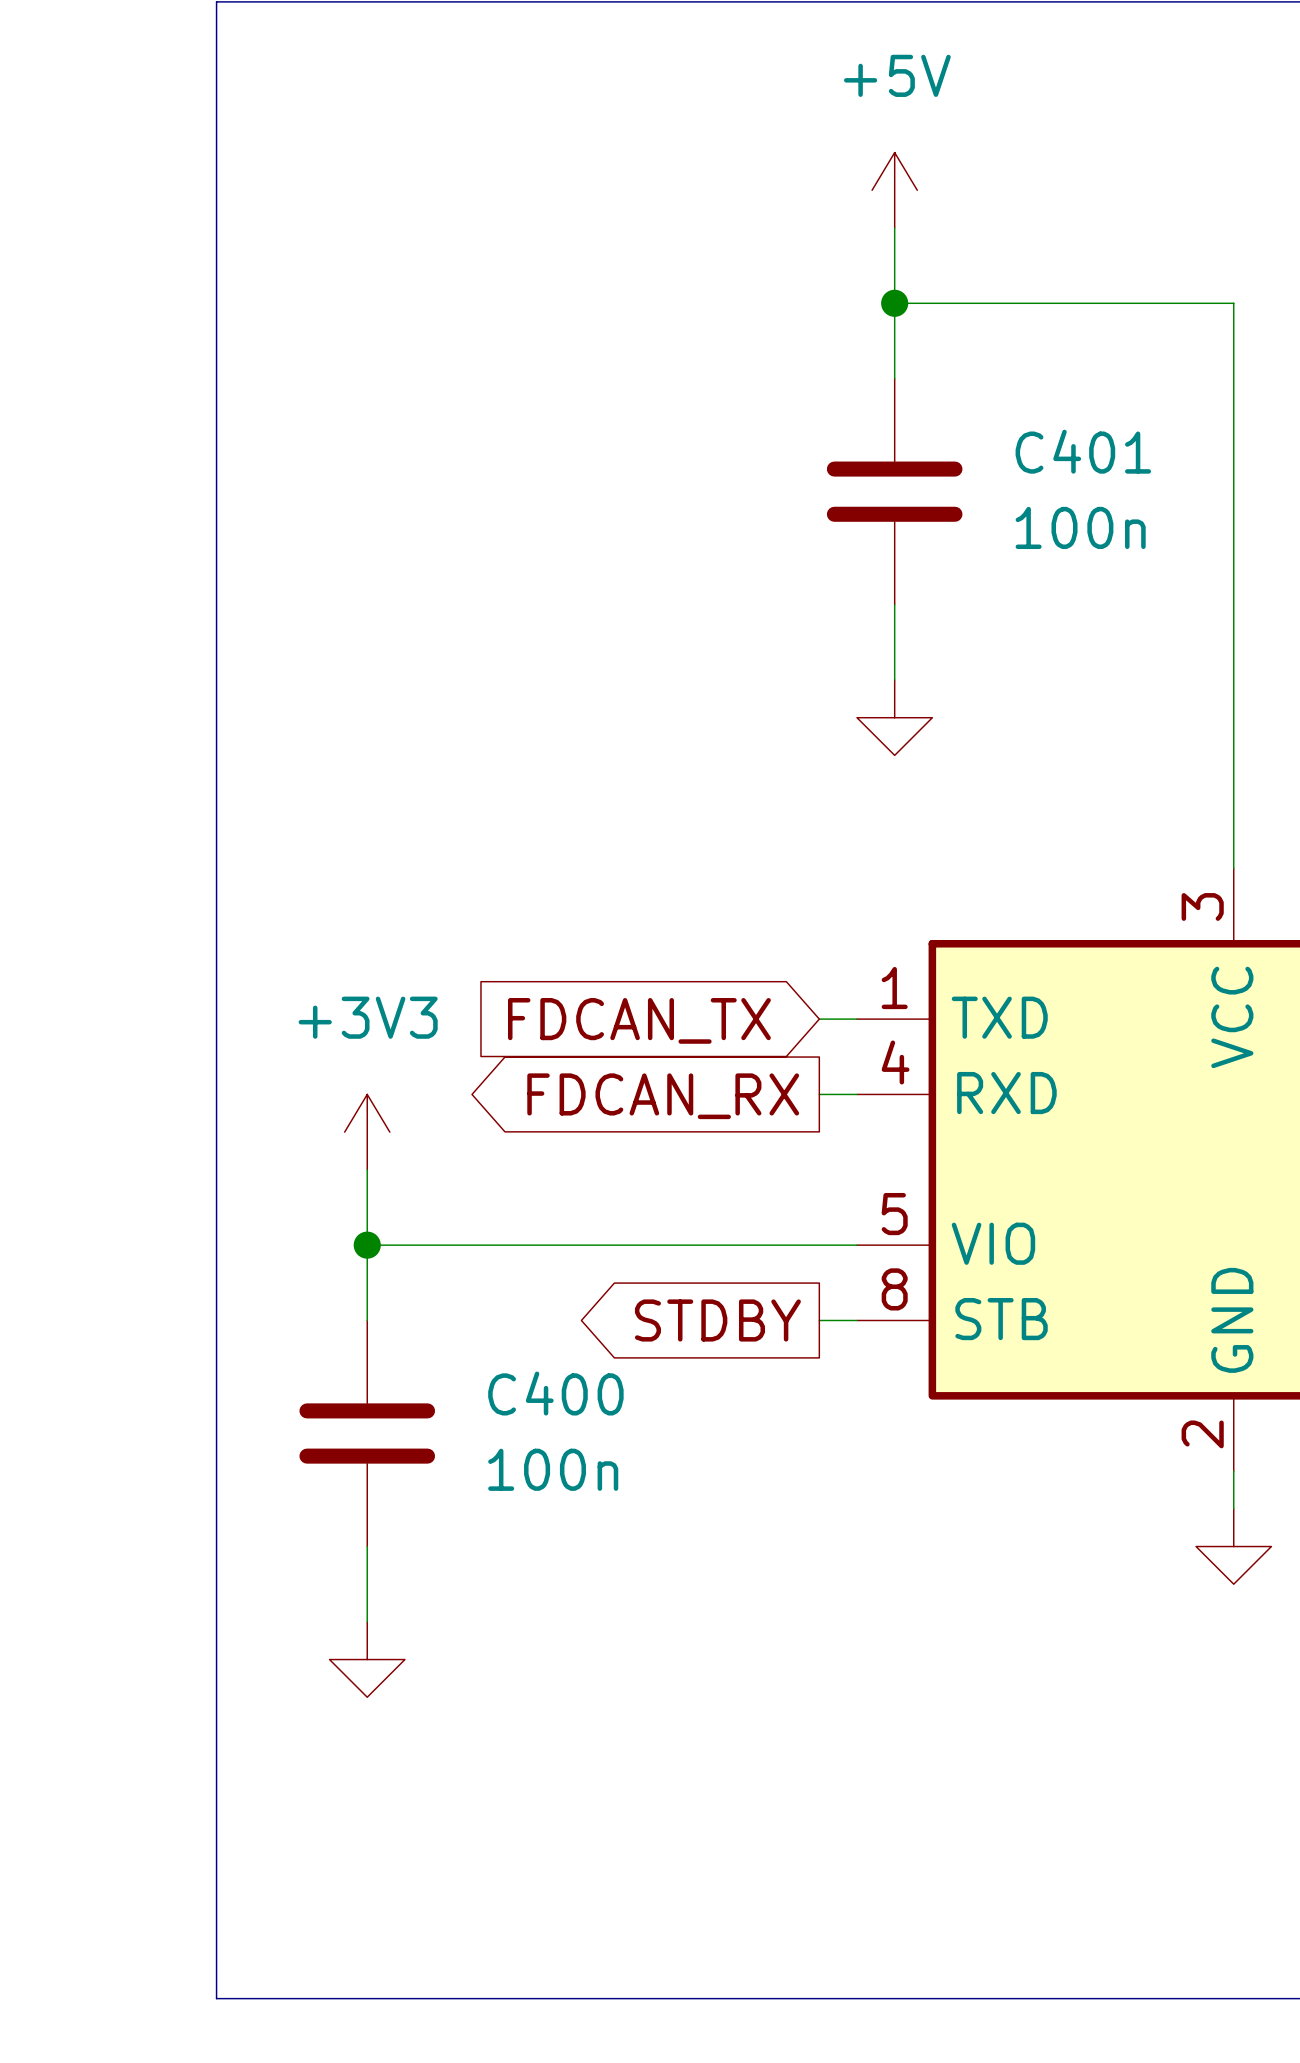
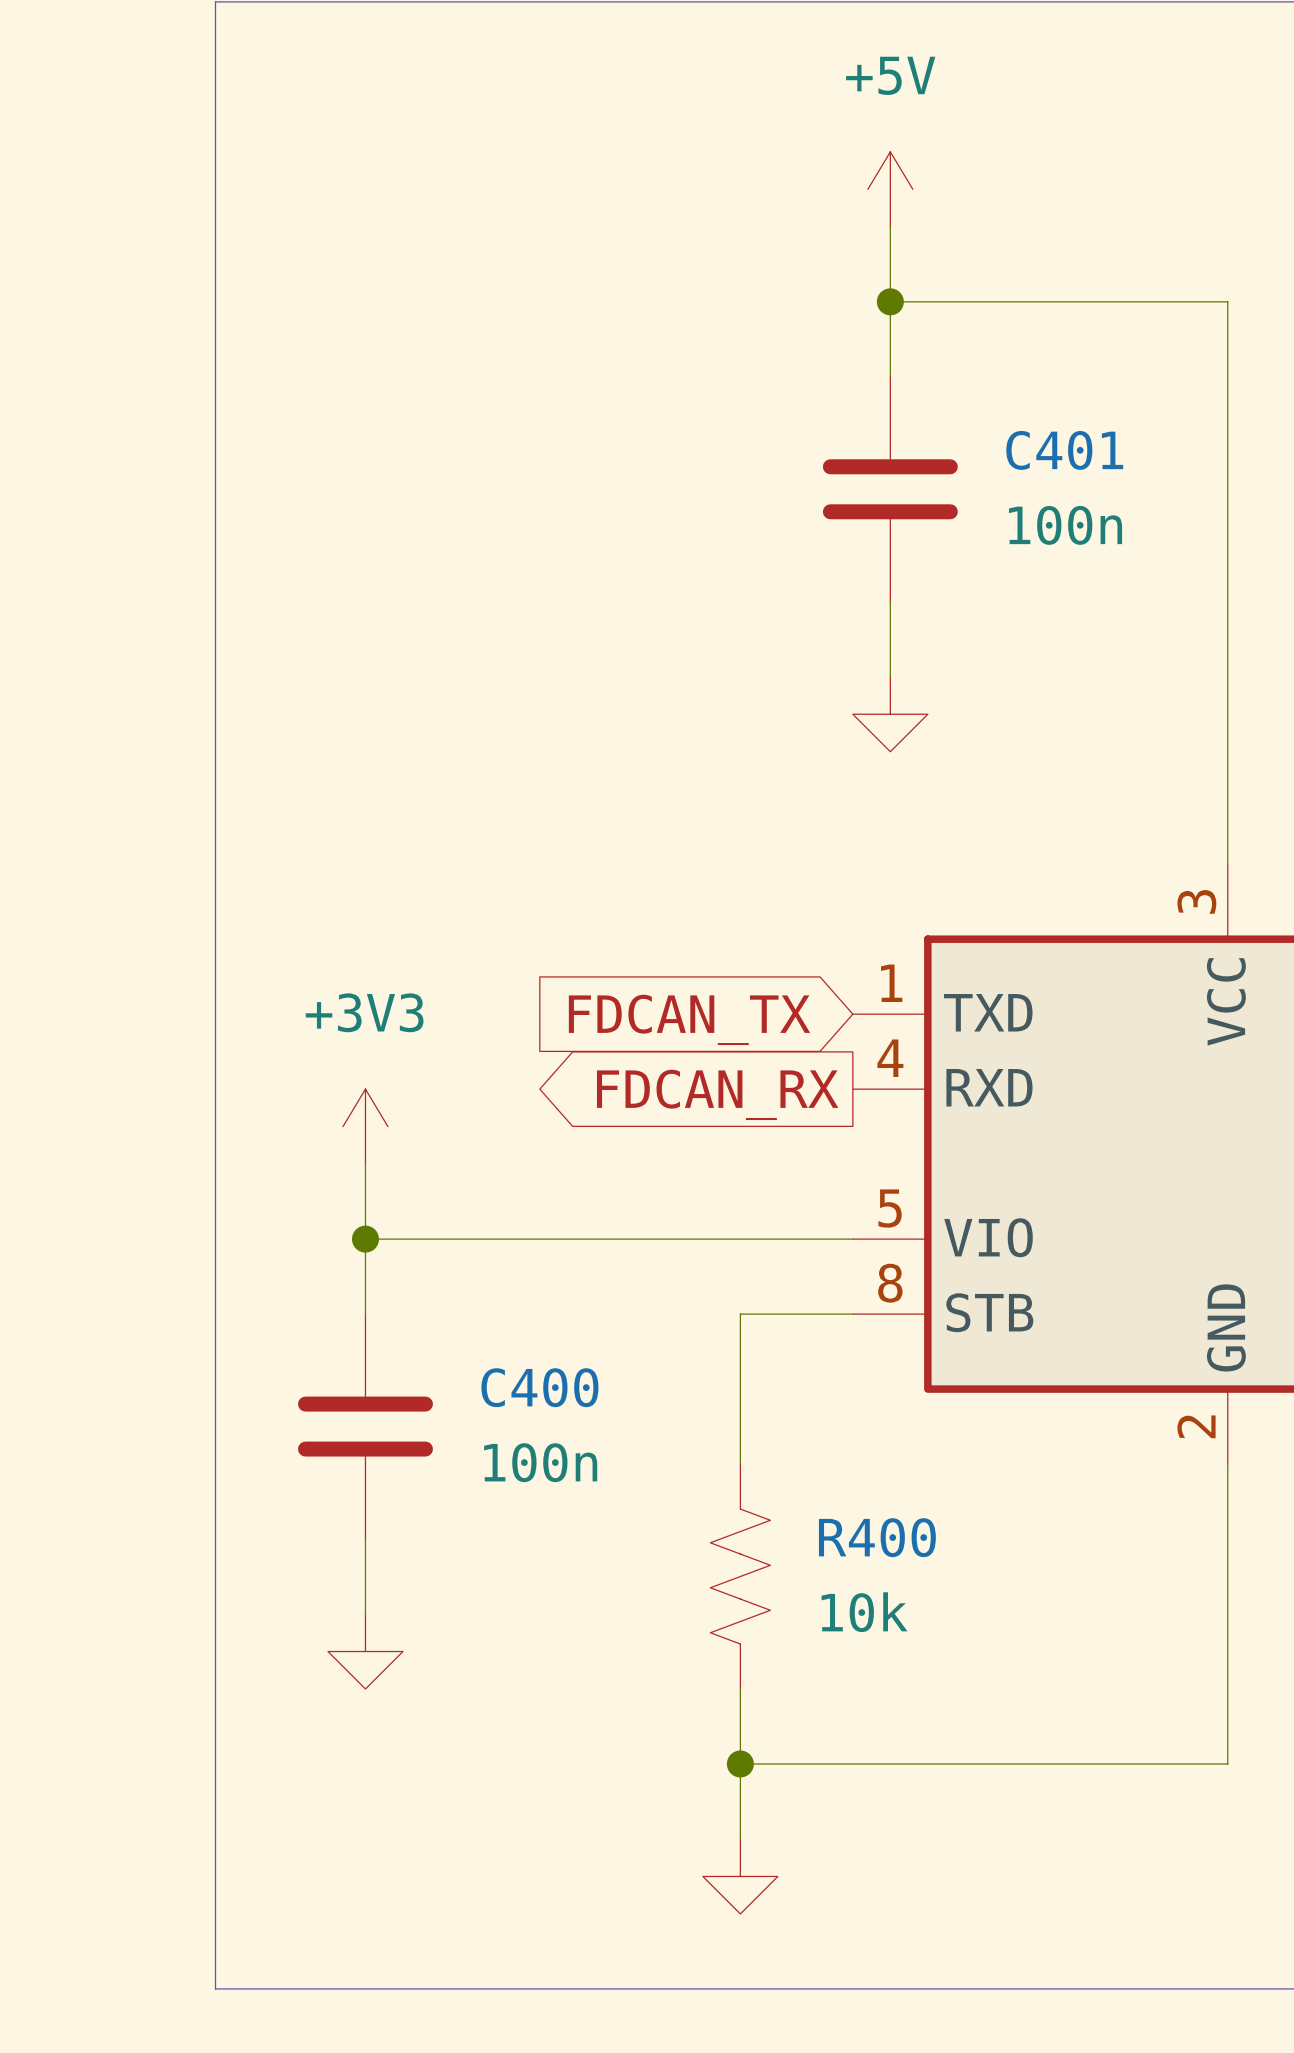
wire: (819, 1019) (857, 1019) -> none
global label position: FDCAN_TX (639, 1020) -> FDCAN_TX (689, 1019)
wire: (819, 1094) (857, 1094) -> none
global label position: FDCAN_RX (663, 1096) -> FDCAN_RX (717, 1094)
global label: STDBY (717, 1320) -> none
wire: none -> (815, 1314) (740, 1314) (740, 1464)
wire: none -> (1227, 1501) (1227, 1763) (740, 1763)
power symbol position: (1233, 1546) -> (740, 1876)
R400: none -> 10k (740, 1576)
wire: none -> (740, 1689) (740, 1838)
junction: none -> (740, 1763)

